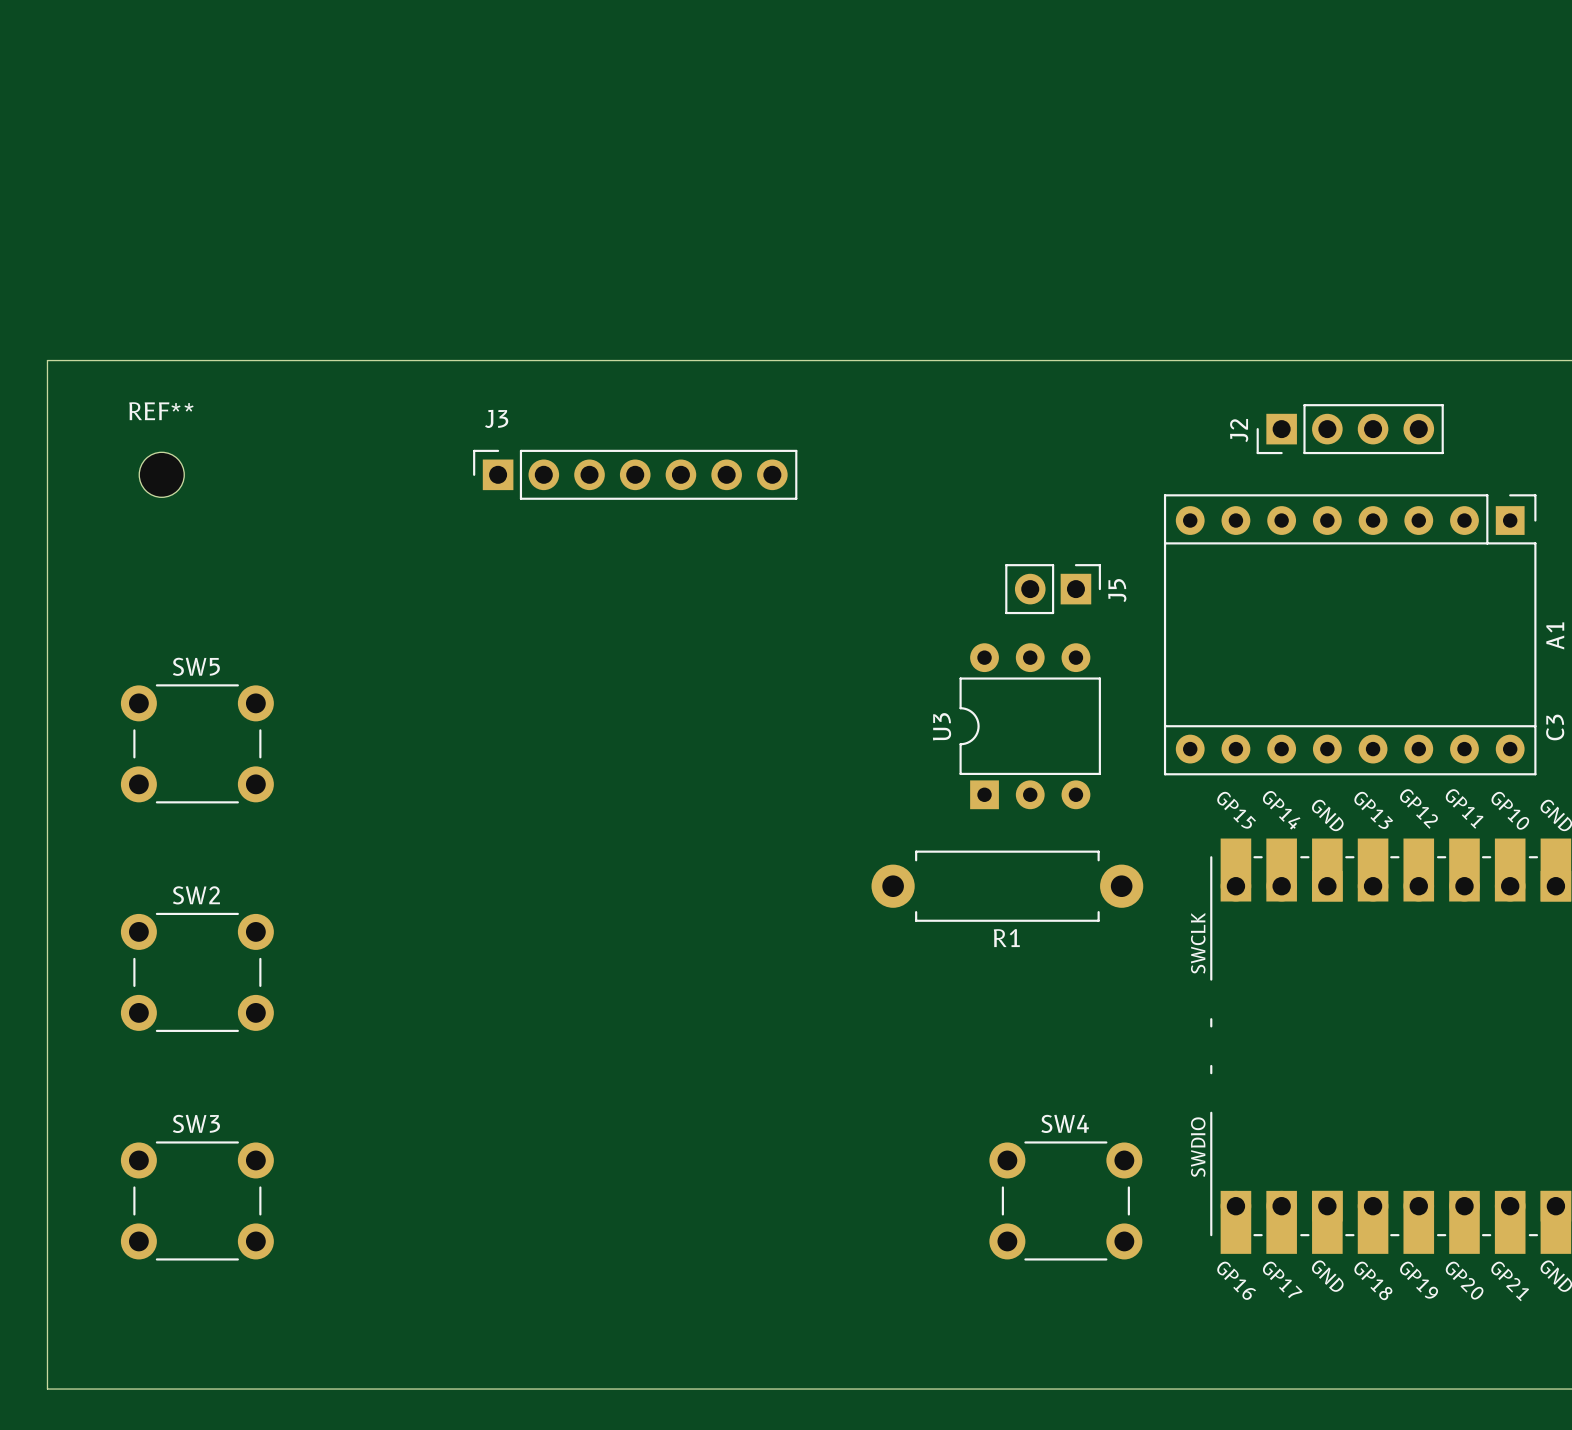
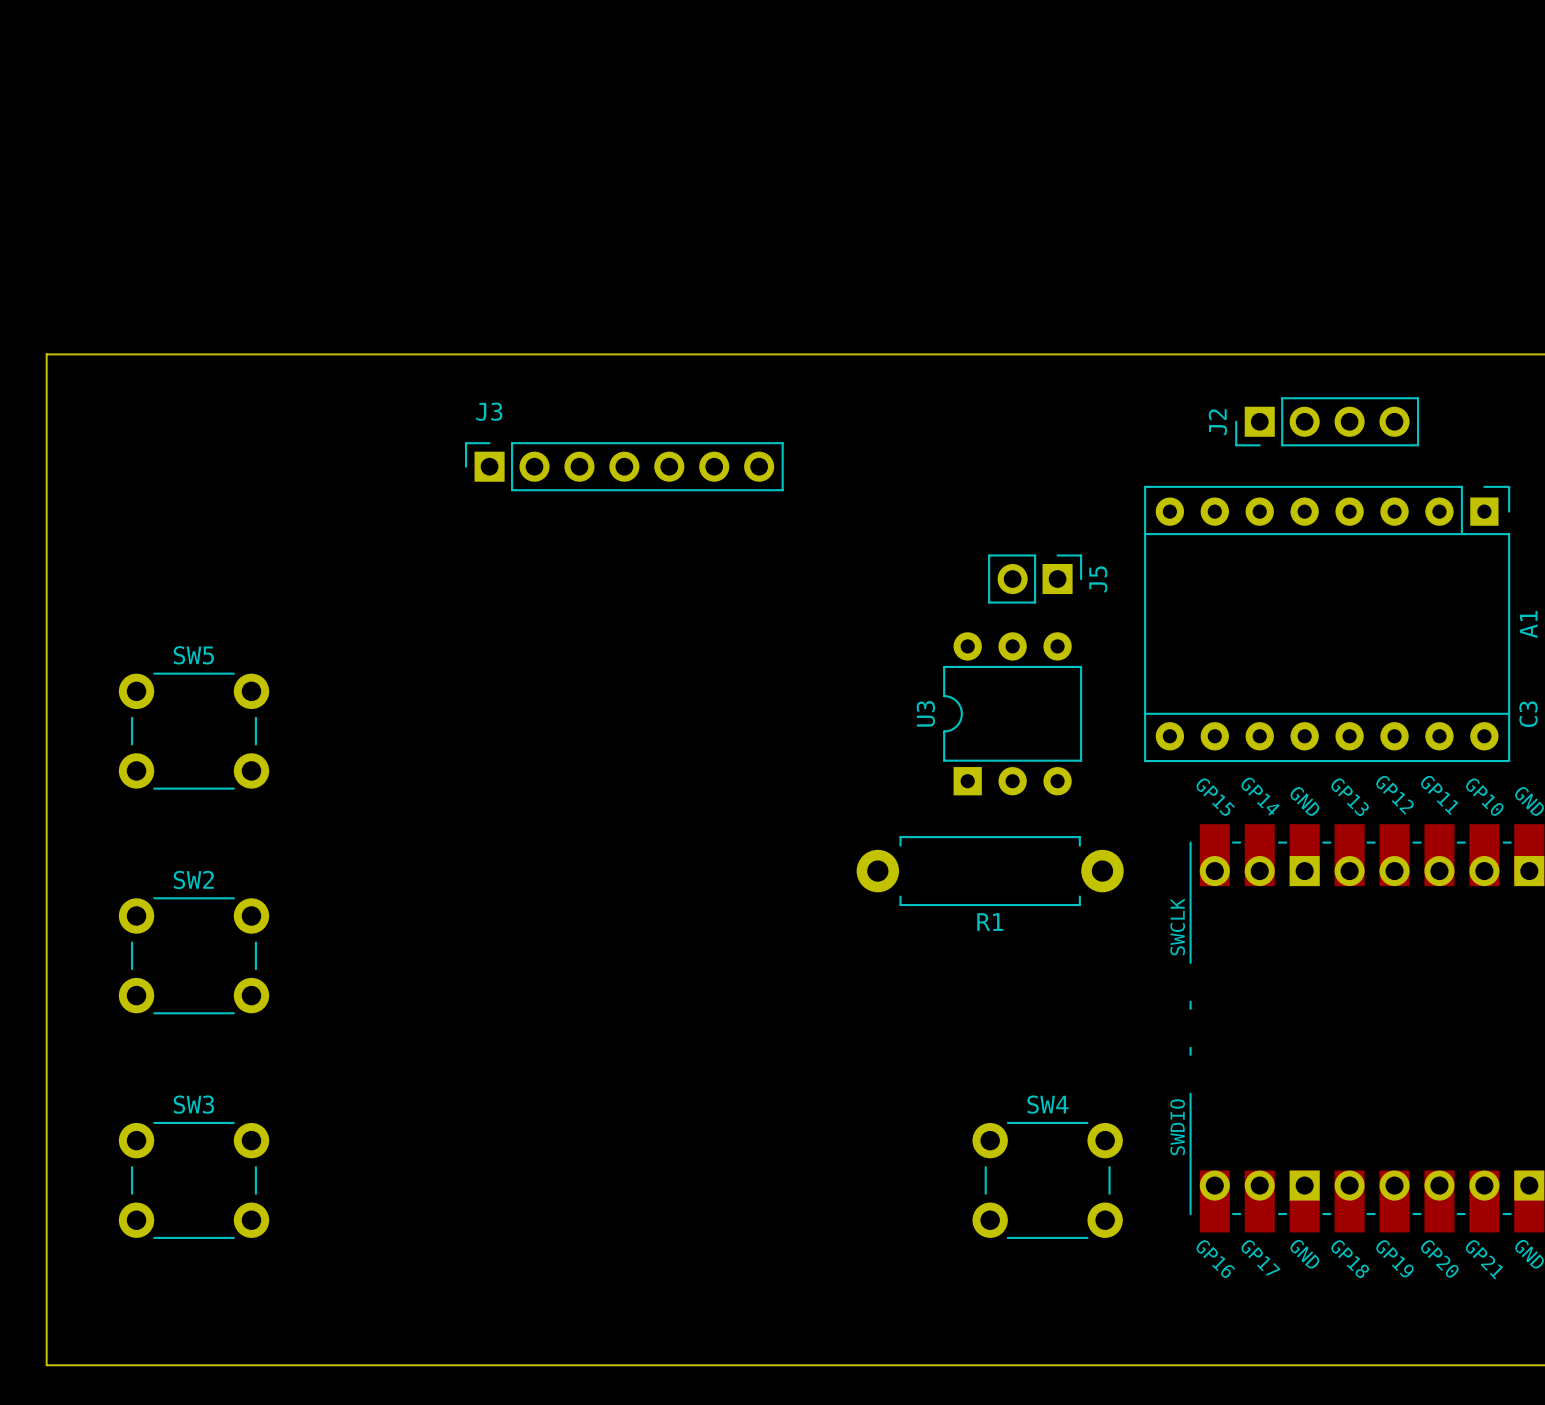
REF**: (161, 474) -> none

